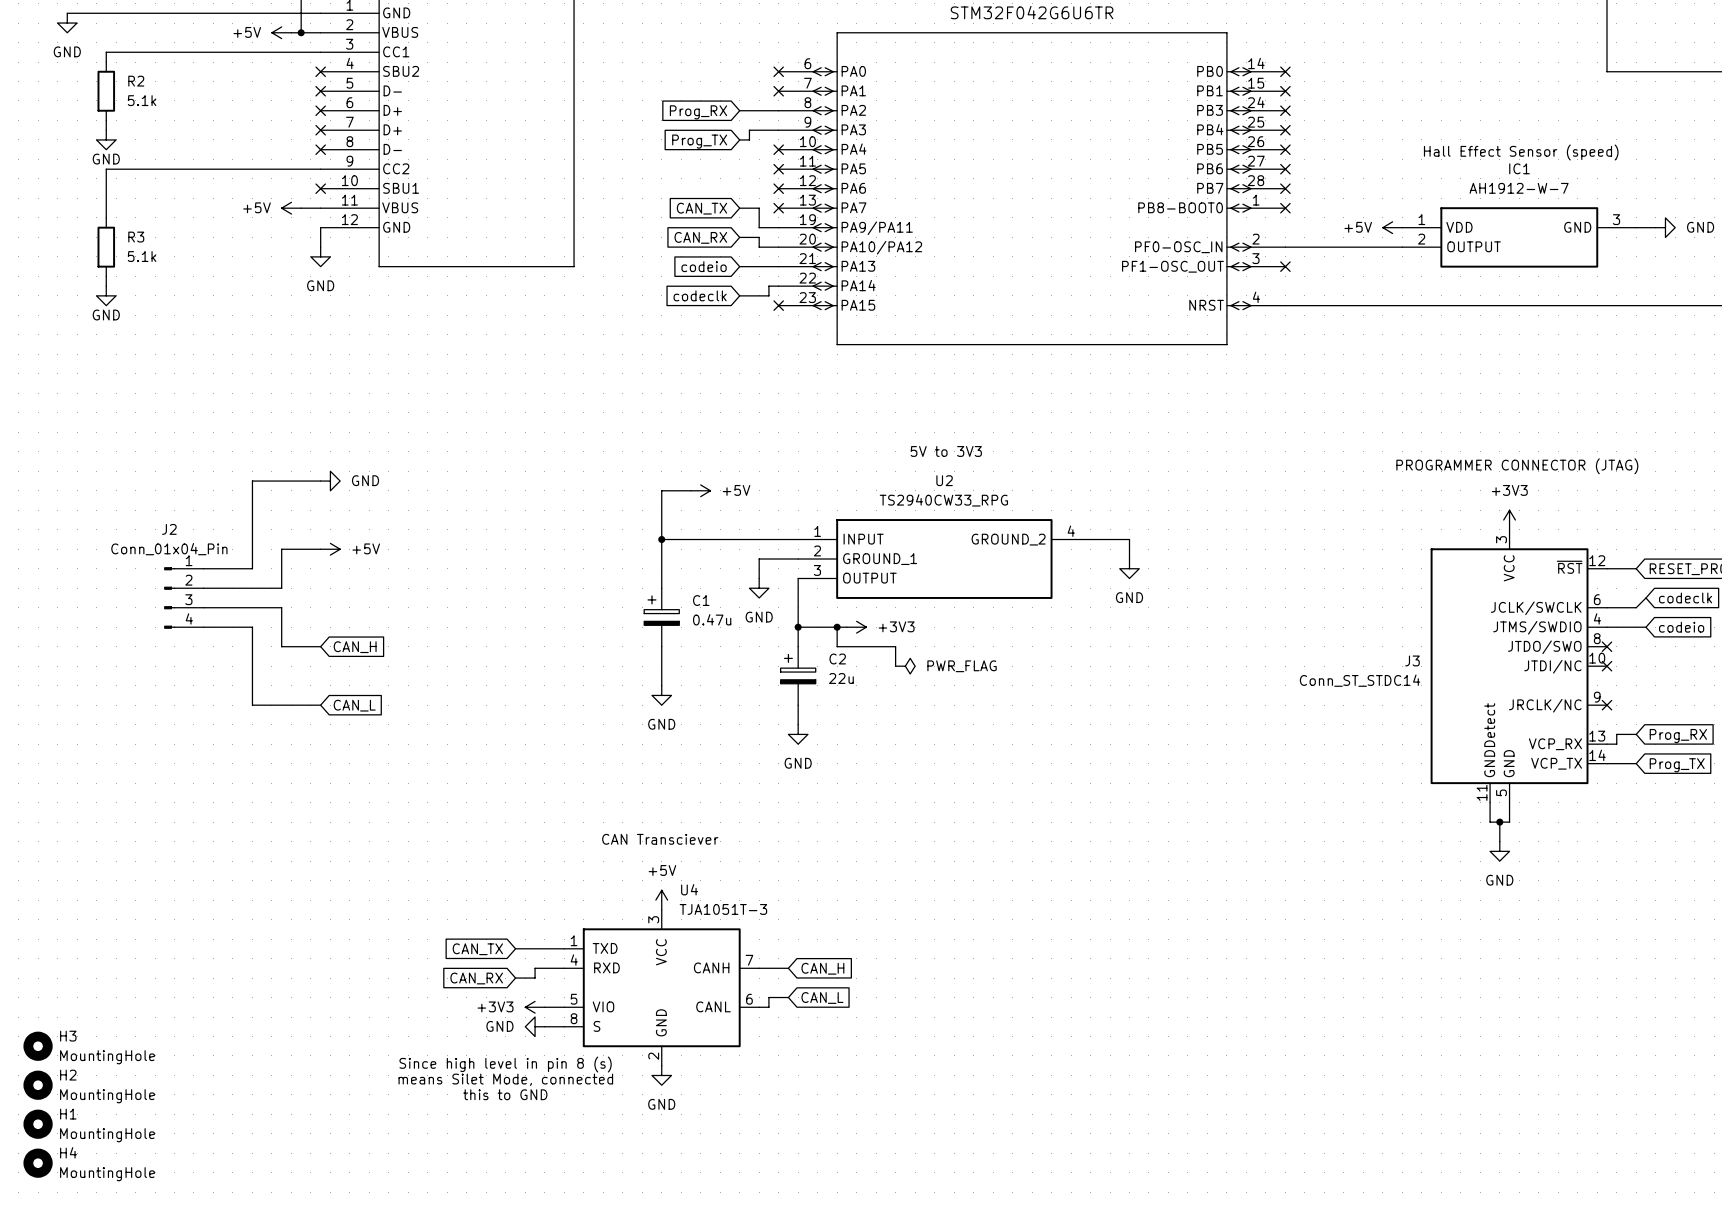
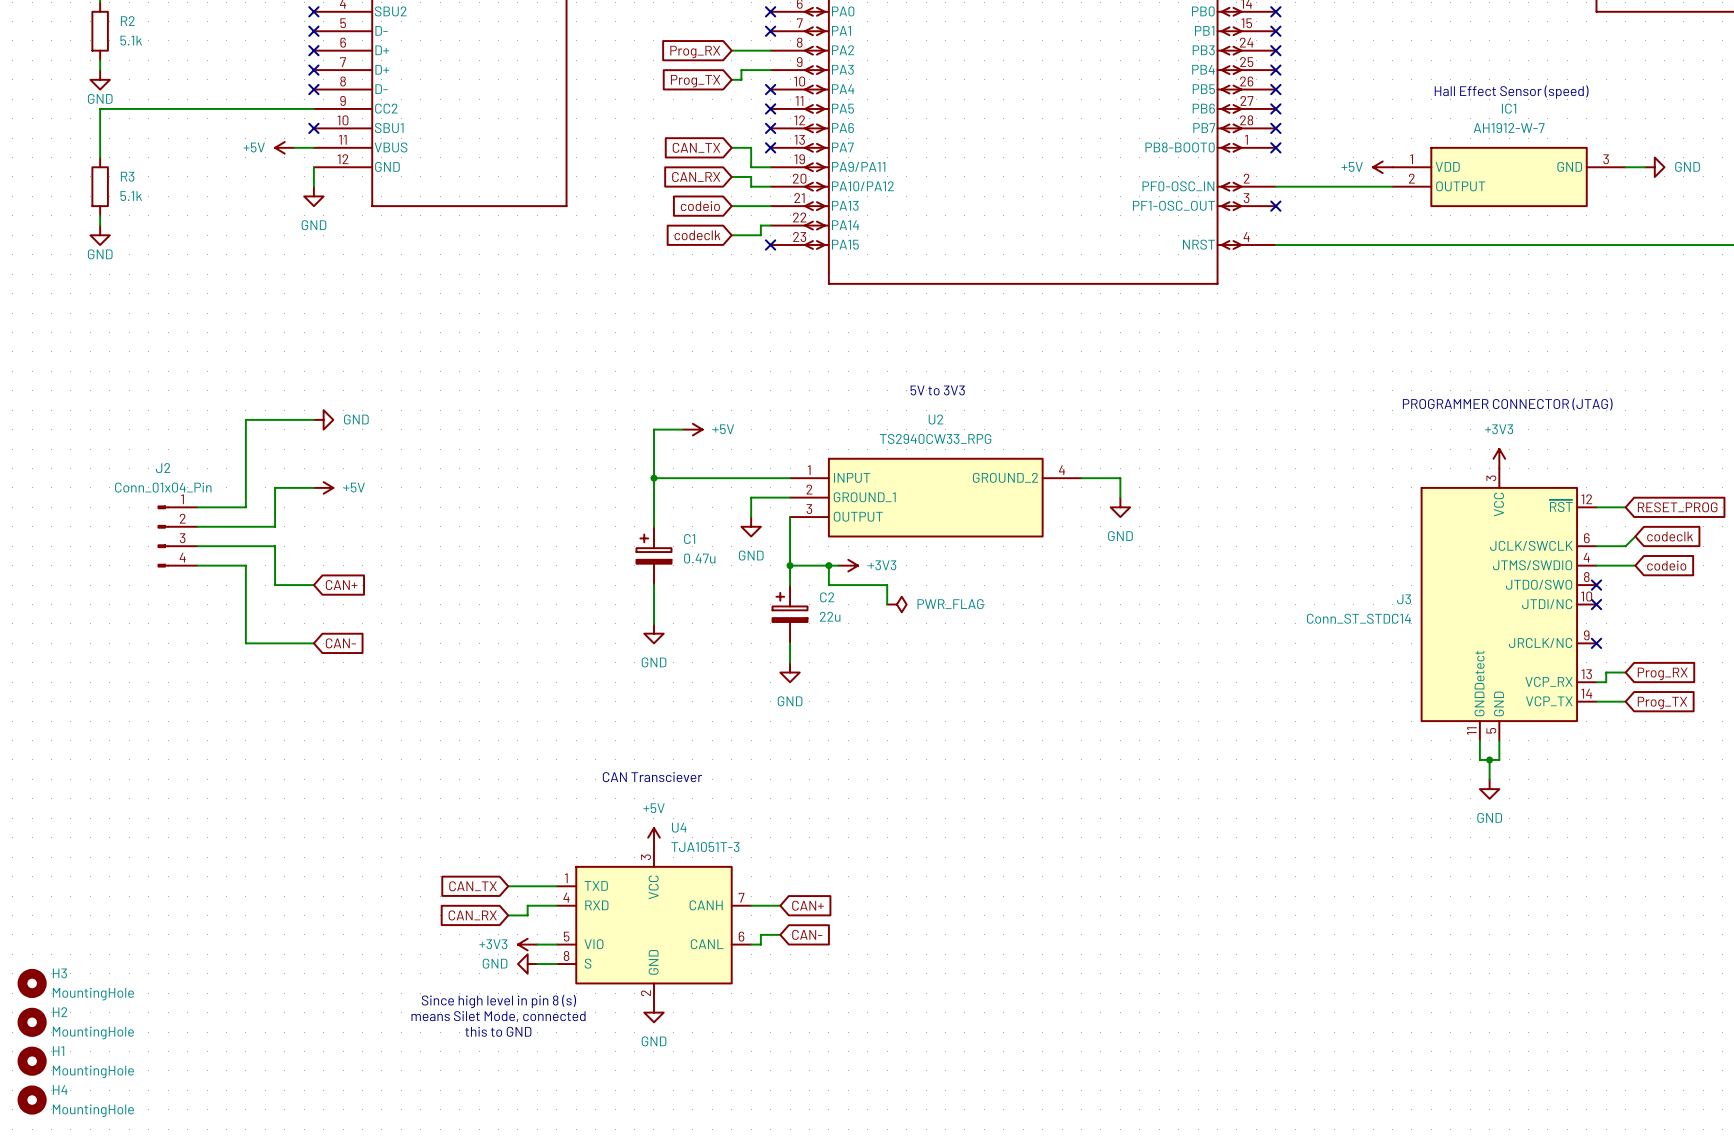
global label: CAN_H (355, 647) -> CAN+ (341, 585)
global label: CAN_L (354, 705) -> CAN- (340, 643)
global label: CAN_H (822, 968) -> CAN+ (808, 905)
global label: CAN_L (822, 997) -> CAN- (807, 934)

